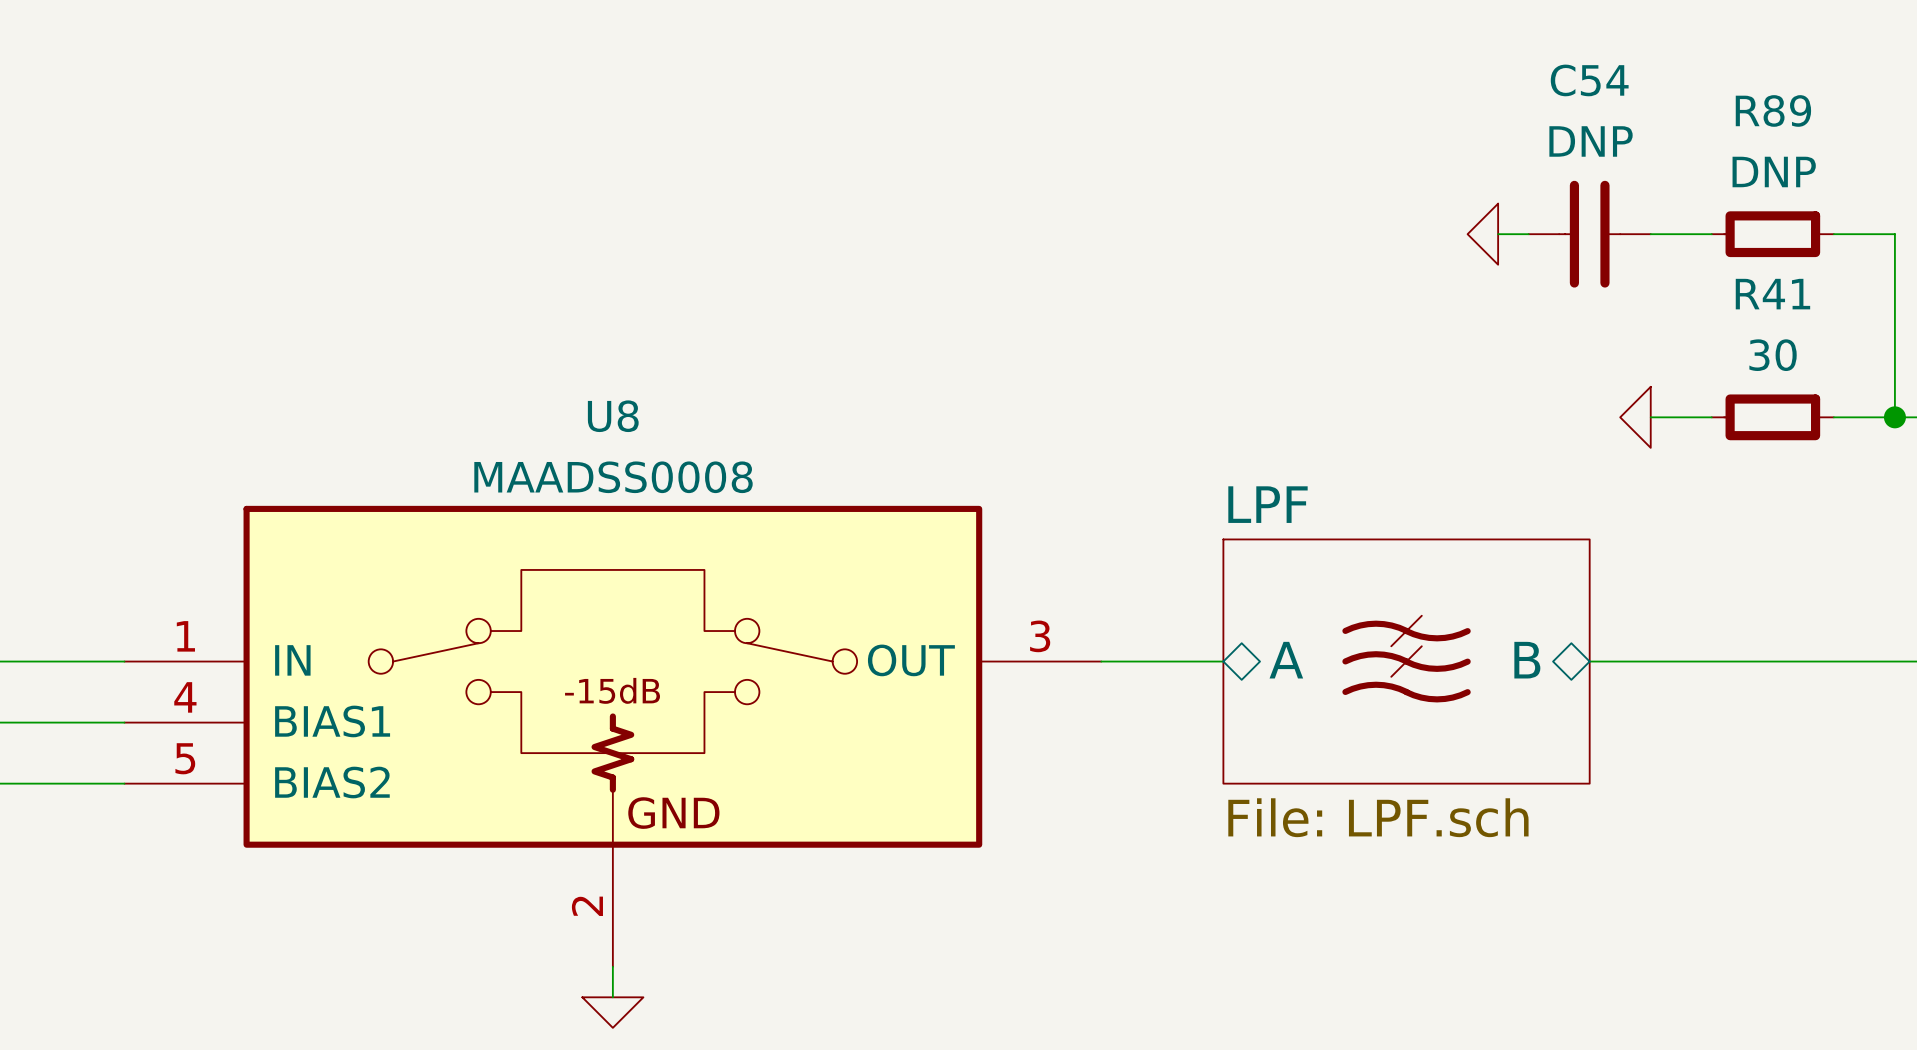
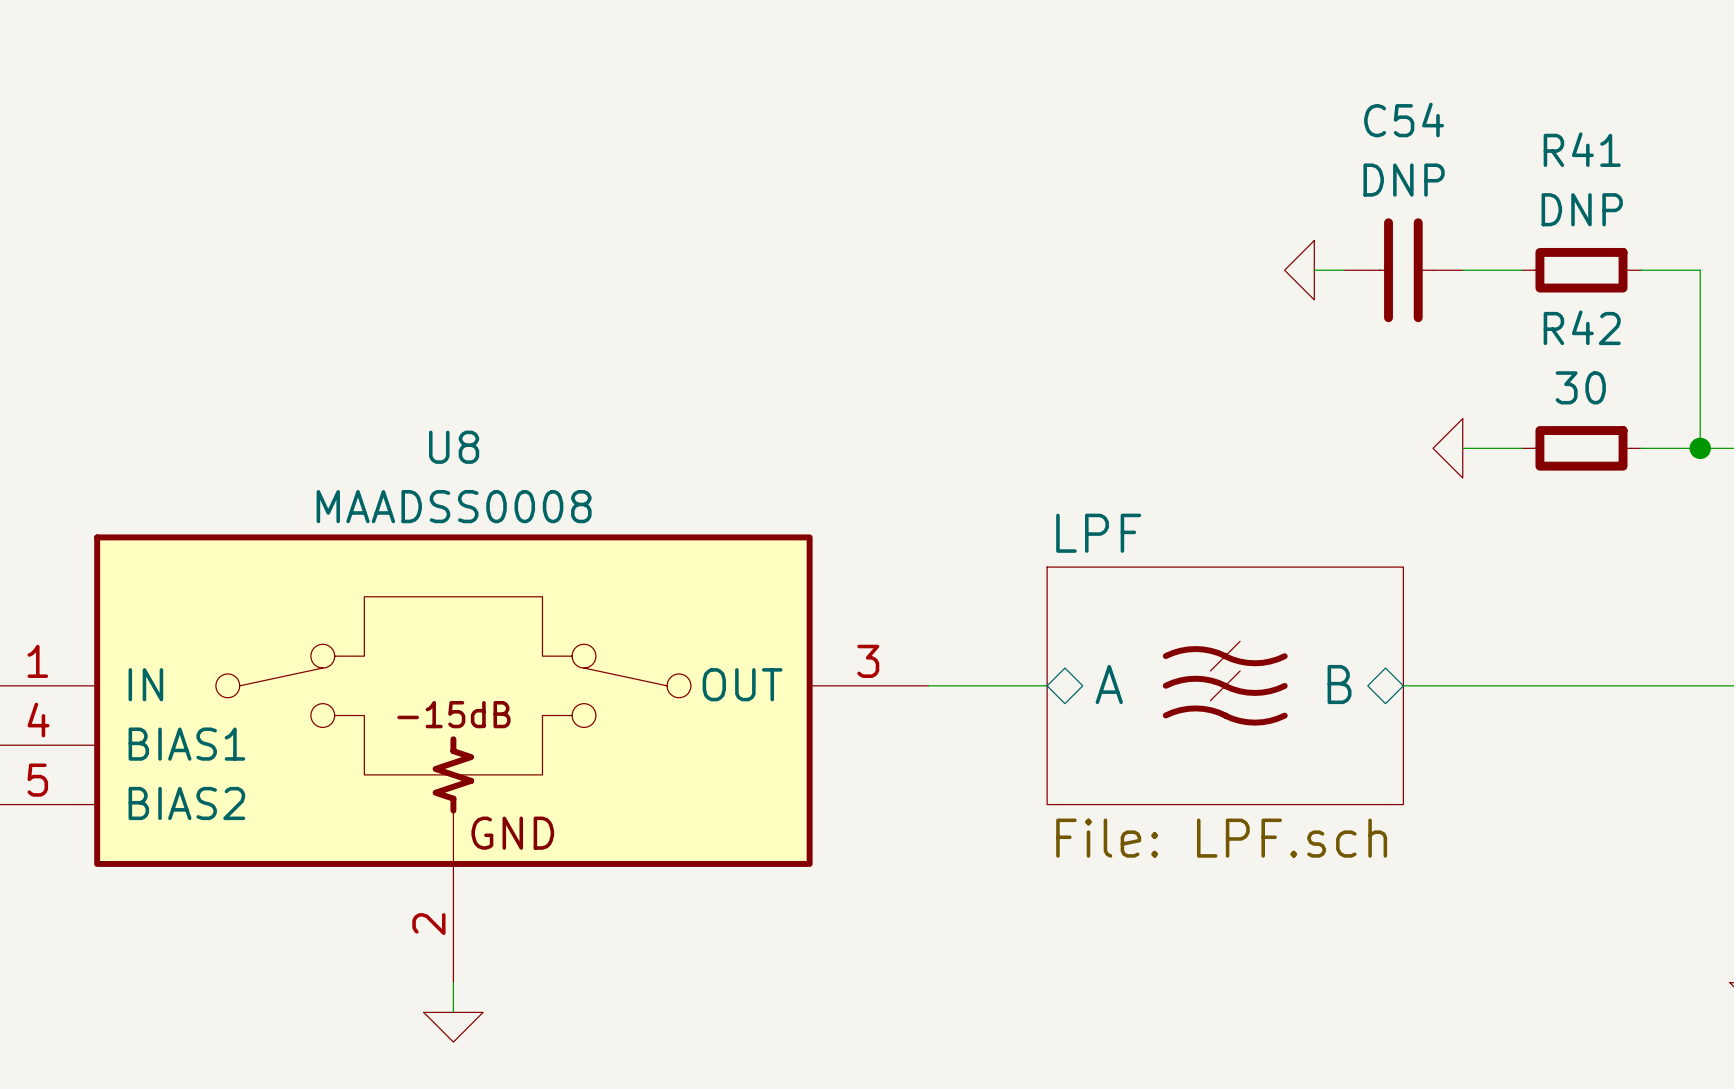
R89 name: R89 (1773, 110) -> R41 (1582, 149)
R41 name: R41 (1772, 294) -> R42 (1582, 327)

